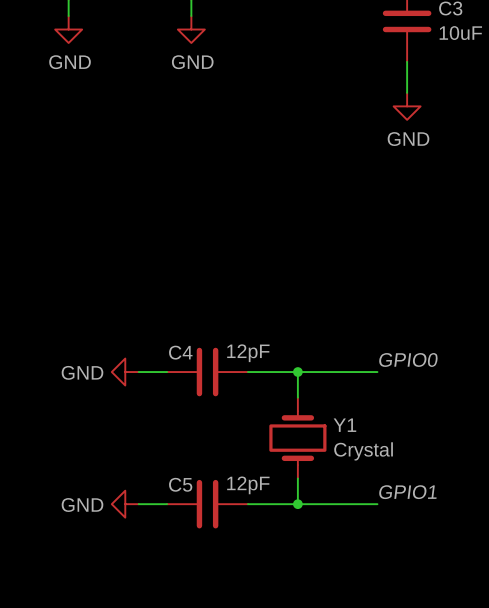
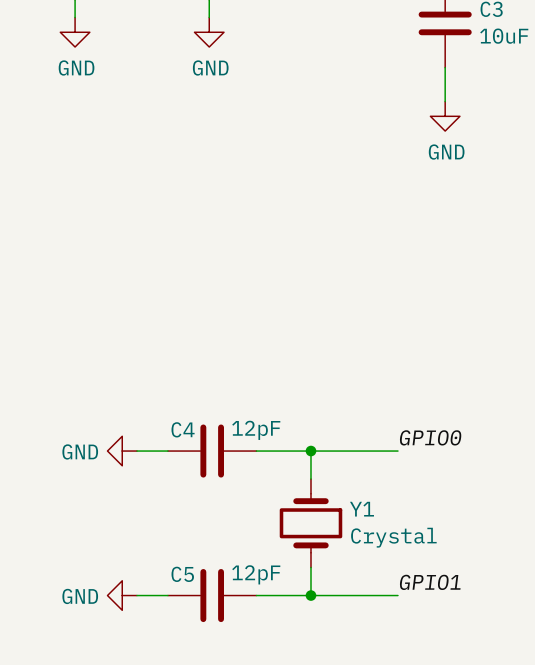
label position: GPIO0 (408, 359) -> GPIO0 (430, 437)
power symbol position: GND (125, 372) -> GND (122, 451)
wire: (138, 372) (167, 372) -> (137, 451) (167, 451)
C4 position: (207, 372) -> (212, 451)
wire: (248, 372) (377, 372) -> (256, 451) (397, 451)
wire: (297, 372) (297, 397) -> (310, 451) (310, 479)
junction position: (297, 372) -> (310, 451)
Y1 position: (297, 438) -> (310, 523)
wire: (297, 478) (297, 504) -> (310, 567) (310, 595)
label position: GPIO1 (407, 492) -> GPIO1 (430, 582)
power symbol position: GND (125, 504) -> GND (122, 595)
wire: (138, 504) (167, 504) -> (137, 595) (167, 595)
C5 position: (207, 504) -> (212, 595)
wire: (248, 504) (377, 504) -> (256, 595) (397, 595)
junction position: (297, 504) -> (310, 595)

